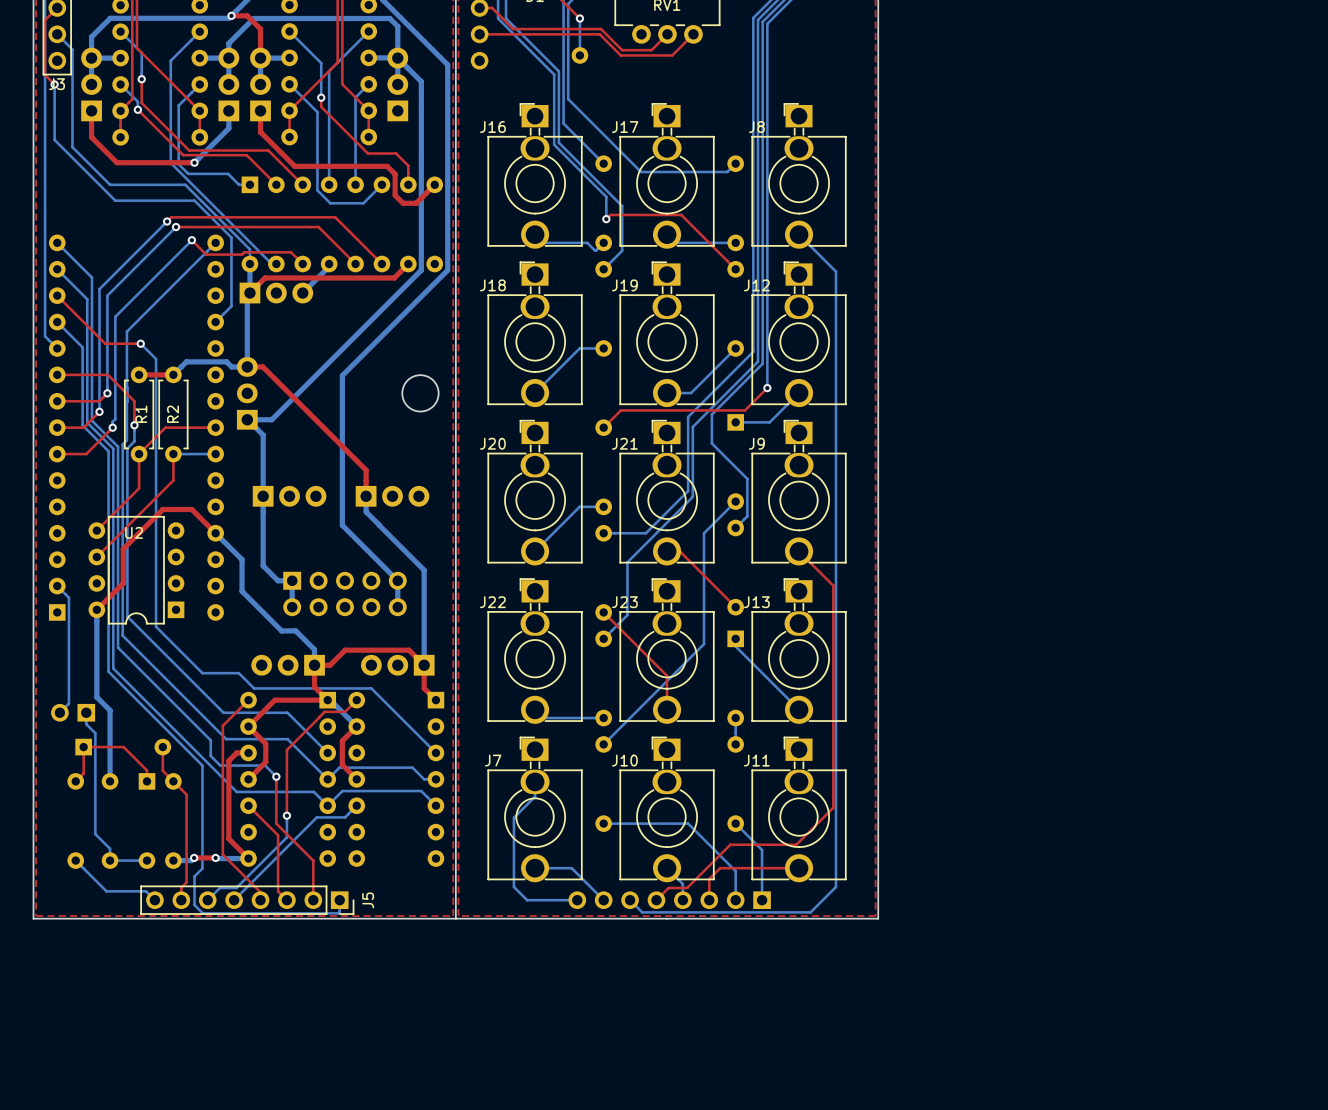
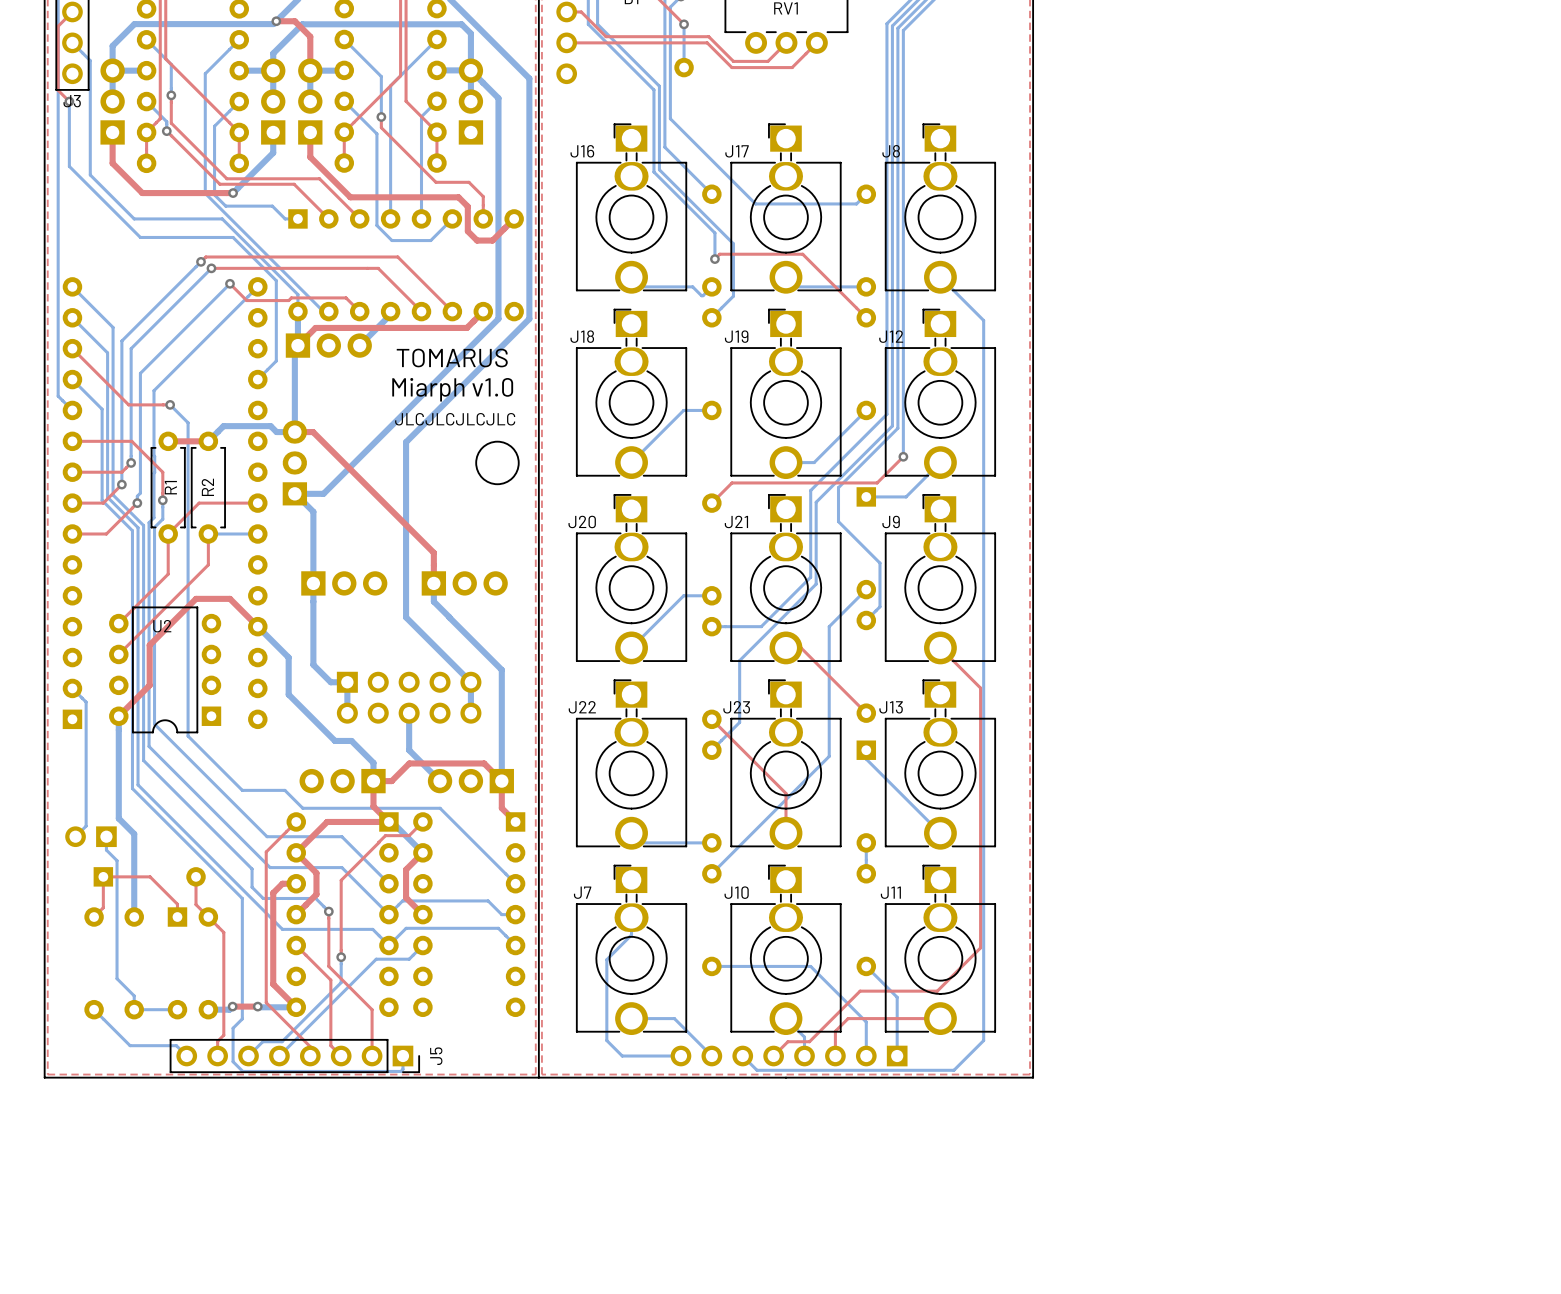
text: none -> TOMARUS (452, 358)
text: none -> Miarph v1.0 (452, 389)
text: none -> JLCJLCJLCJLC (455, 419)
bottom track: none -> (409, 713) (409, 750) (440, 781)

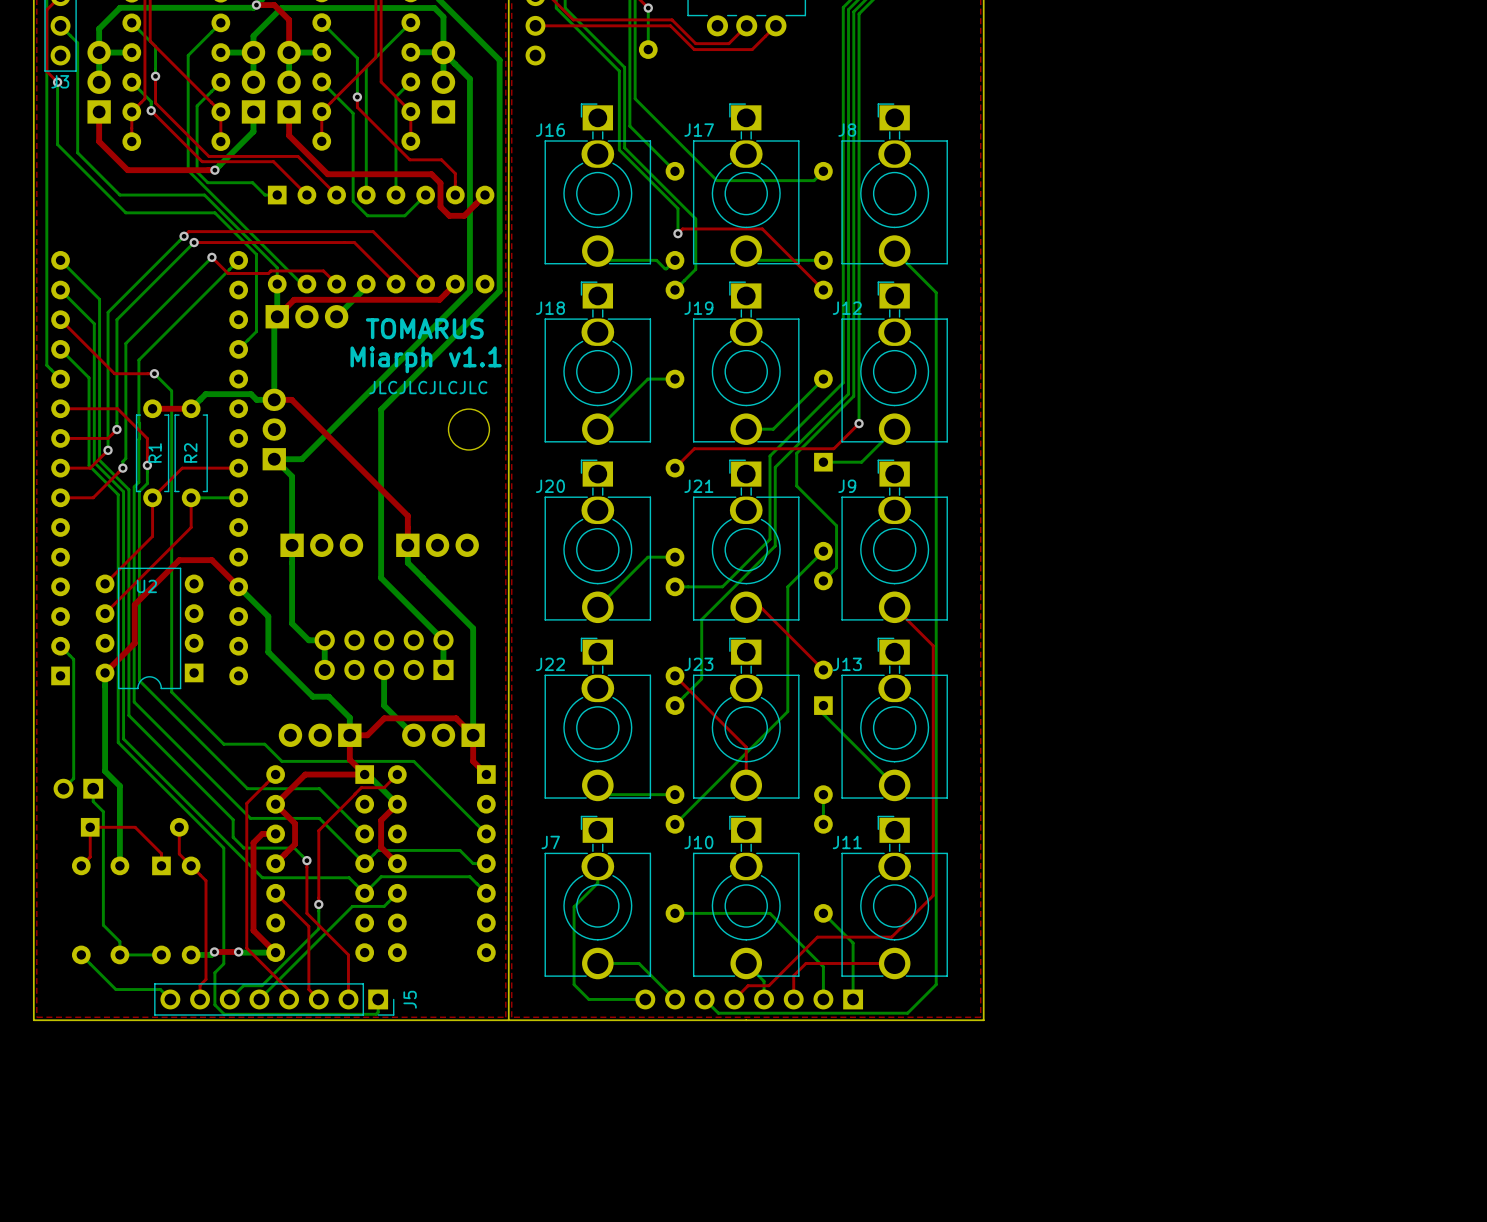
text: Miarph v1.0 (452, 389) -> Miarph v1.1 (426, 359)
part rotation: 0° (409, 697) -> 180° (384, 655)

